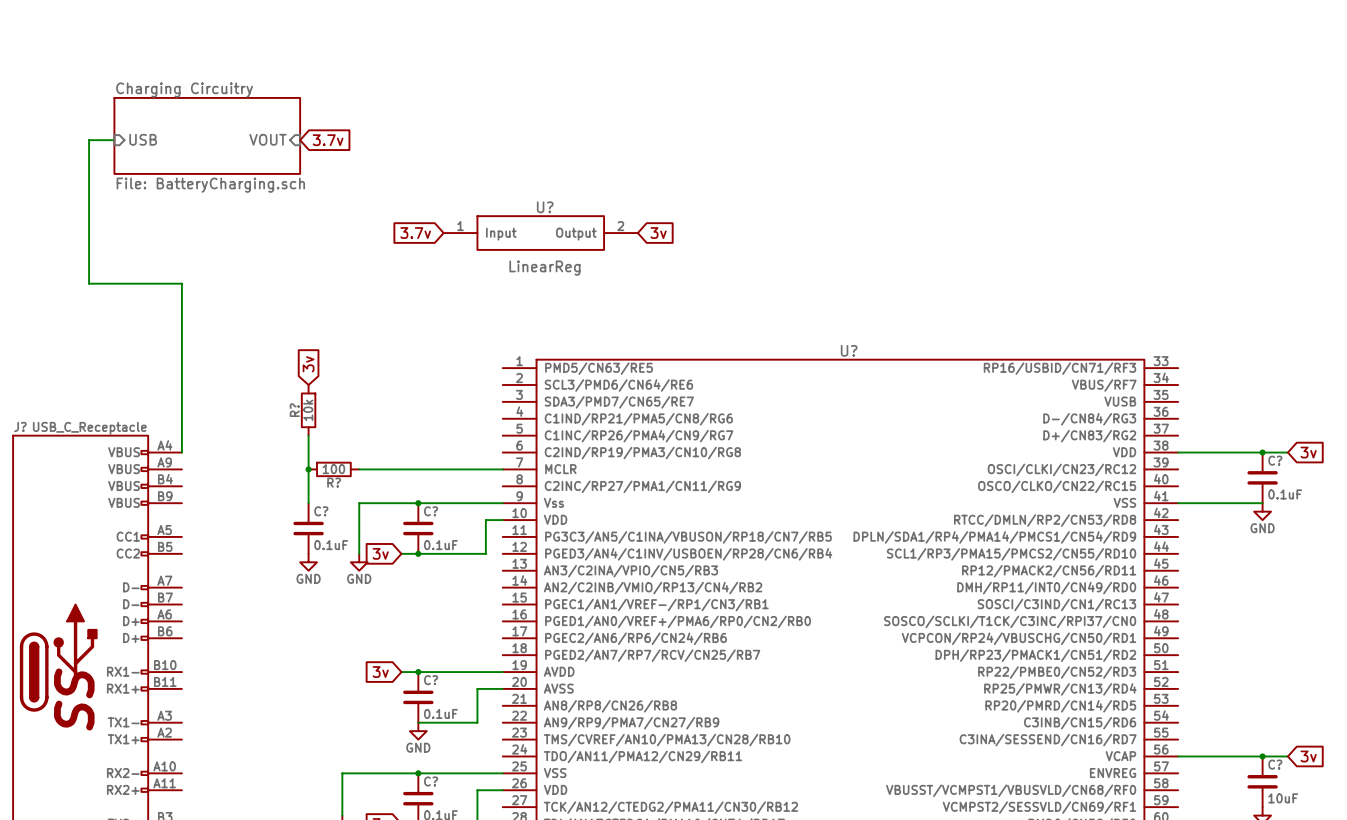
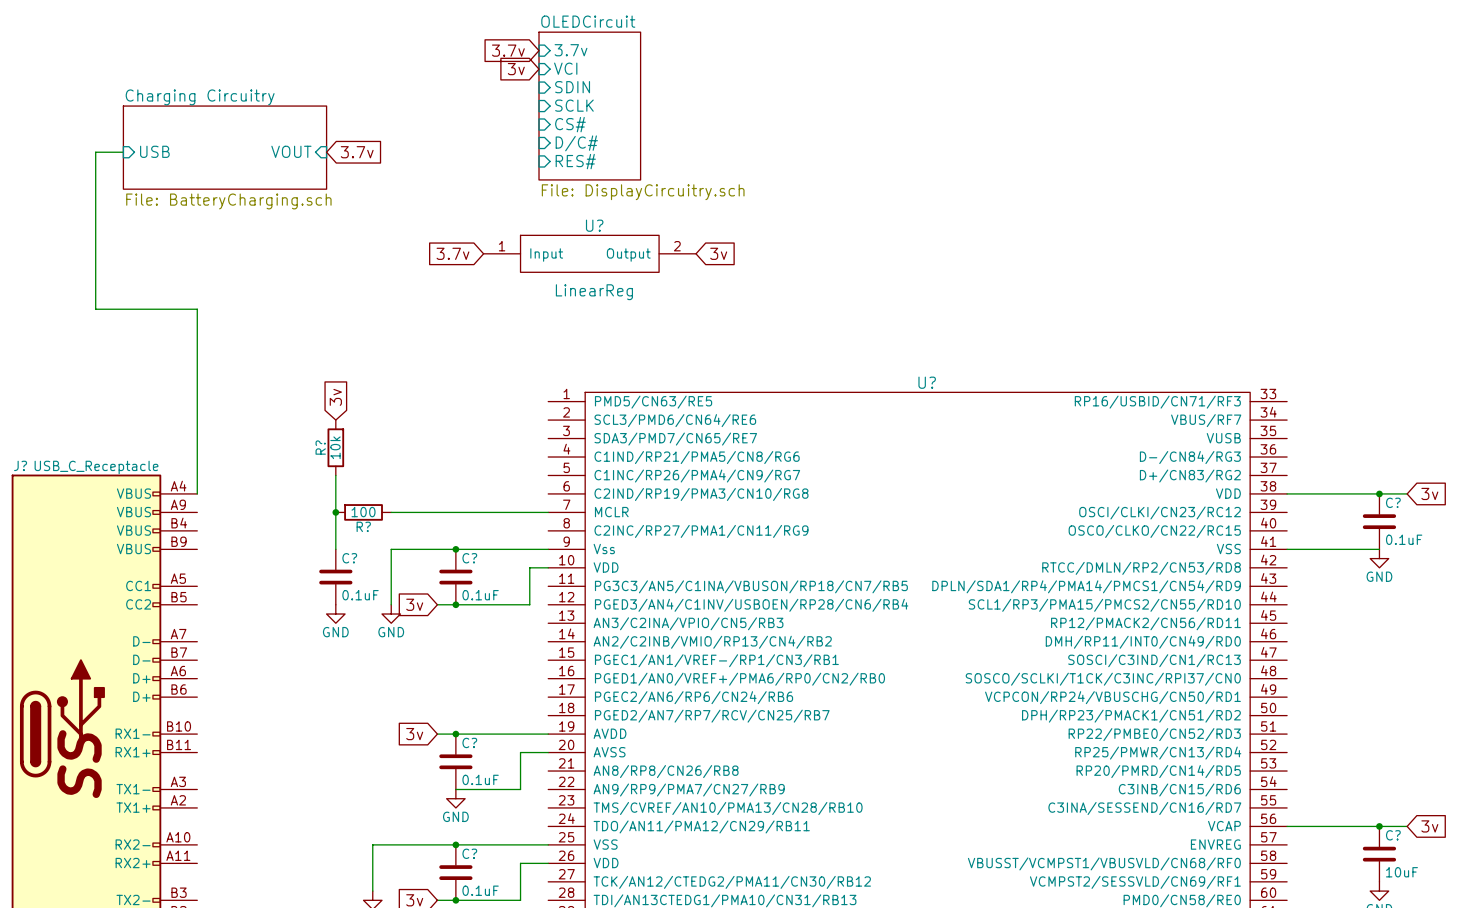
sheet pin: none -> 3.7v (571, 50)
global label: none -> 3.7v (508, 50)
sheet pin: none -> VCI (565, 68)
global label: none -> 3v (516, 69)
sheet pin: none -> SDIN (572, 87)
sheet pin: none -> SCLK (574, 105)
sheet OLEDCircuit: none -> File: DisplayCircuitry.sch (589, 106)
sheet pin: none -> CS# (570, 124)
sheet pin: none -> D/C# (576, 143)
sheet pin: none -> RES# (575, 161)

